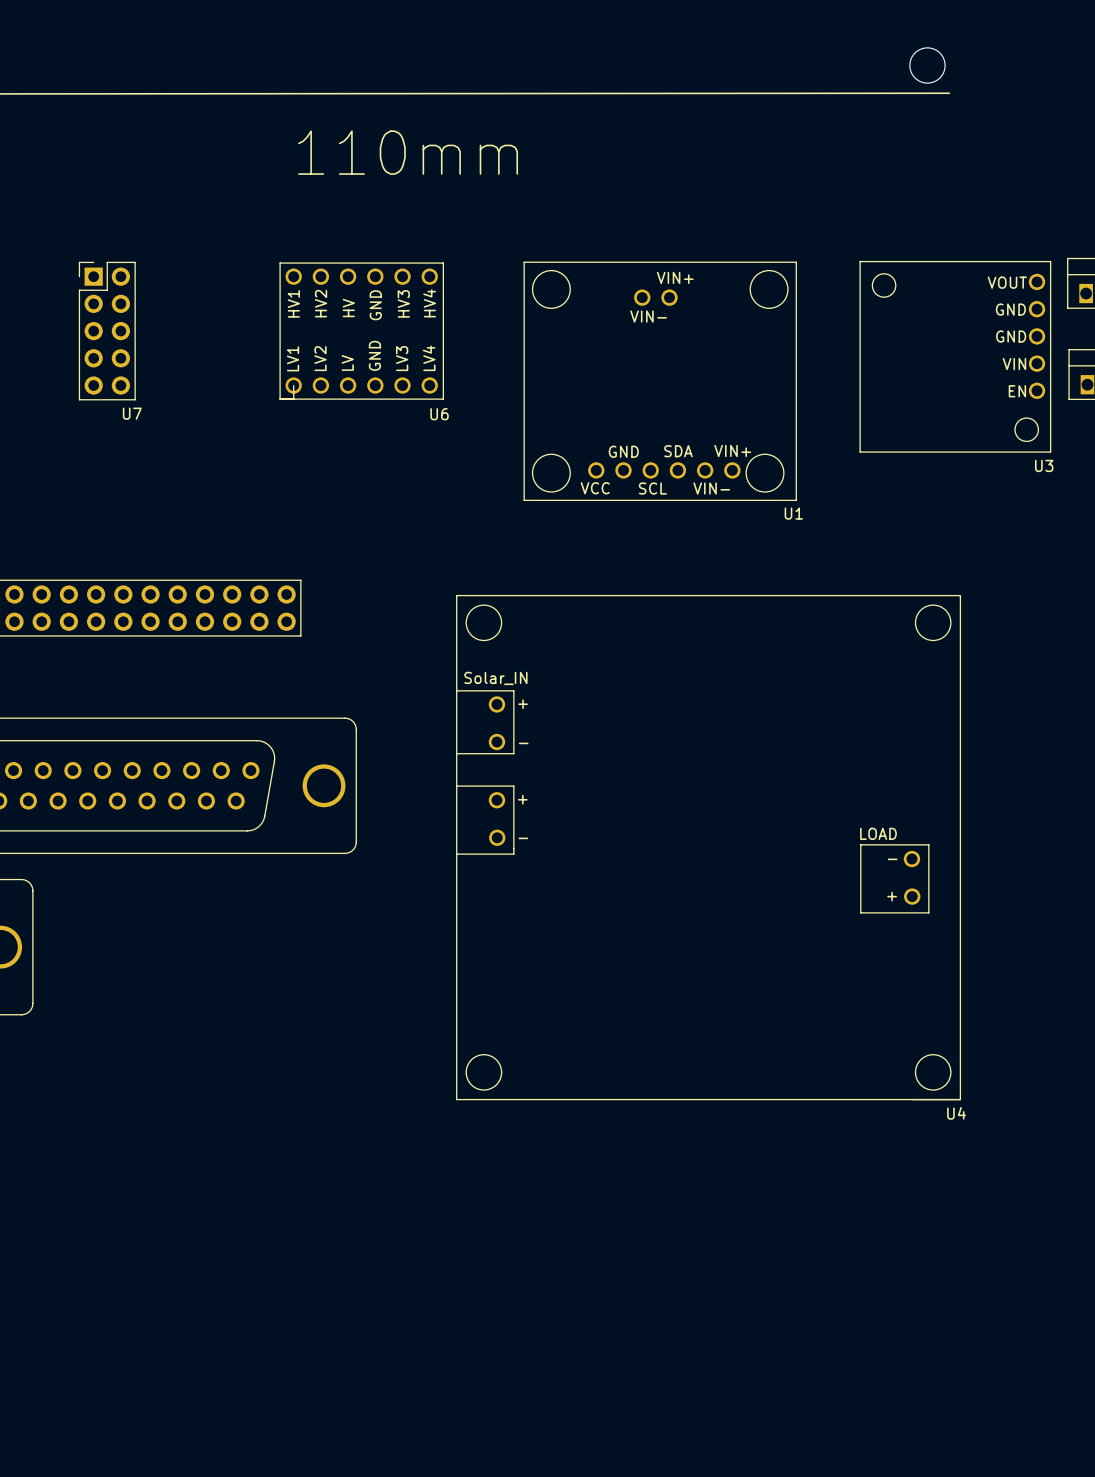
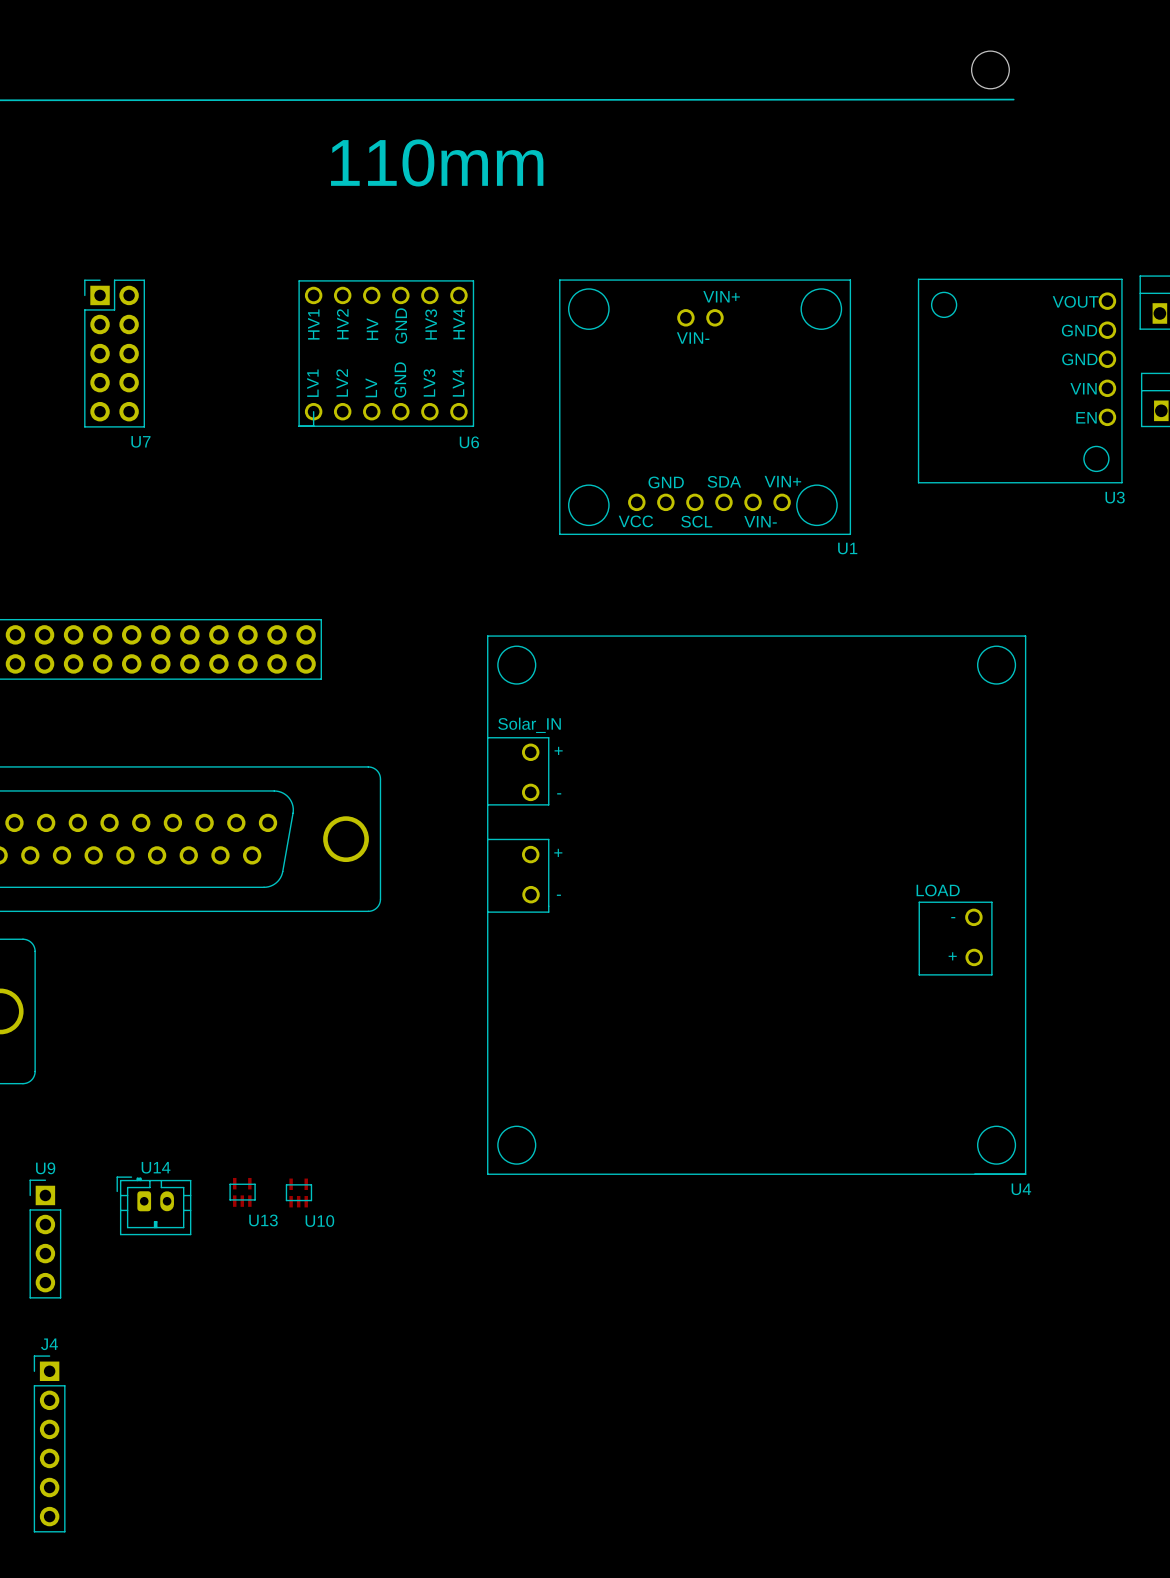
U13: none -> (242, 1192)
U10: none -> (298, 1192)
U14: none -> (153, 1205)
U9: none -> (45, 1239)
J4: none -> (49, 1443)

